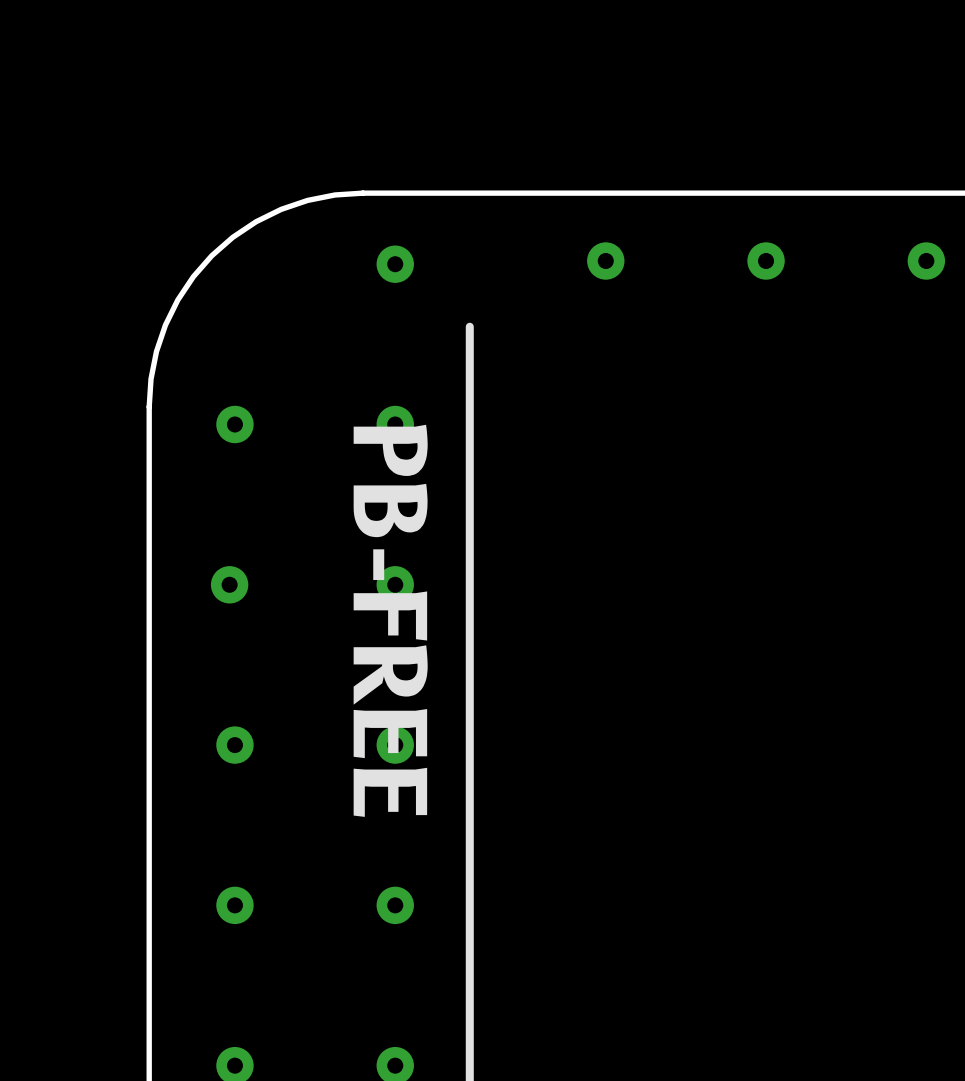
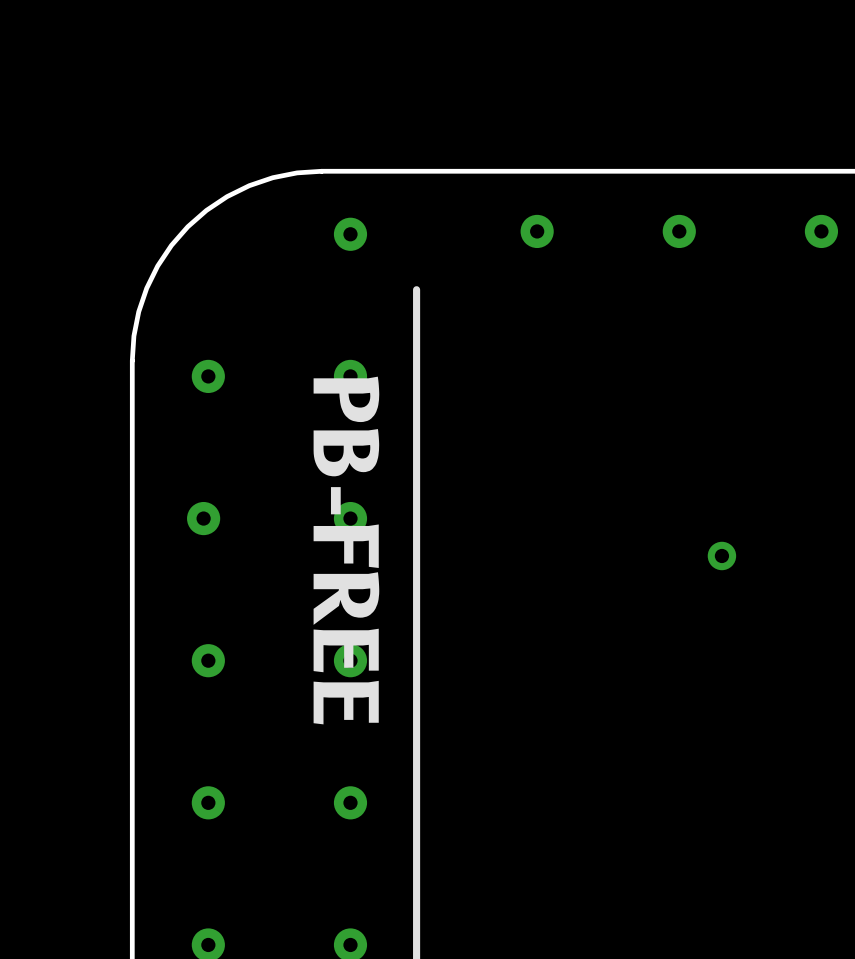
via: none -> (721, 555)

